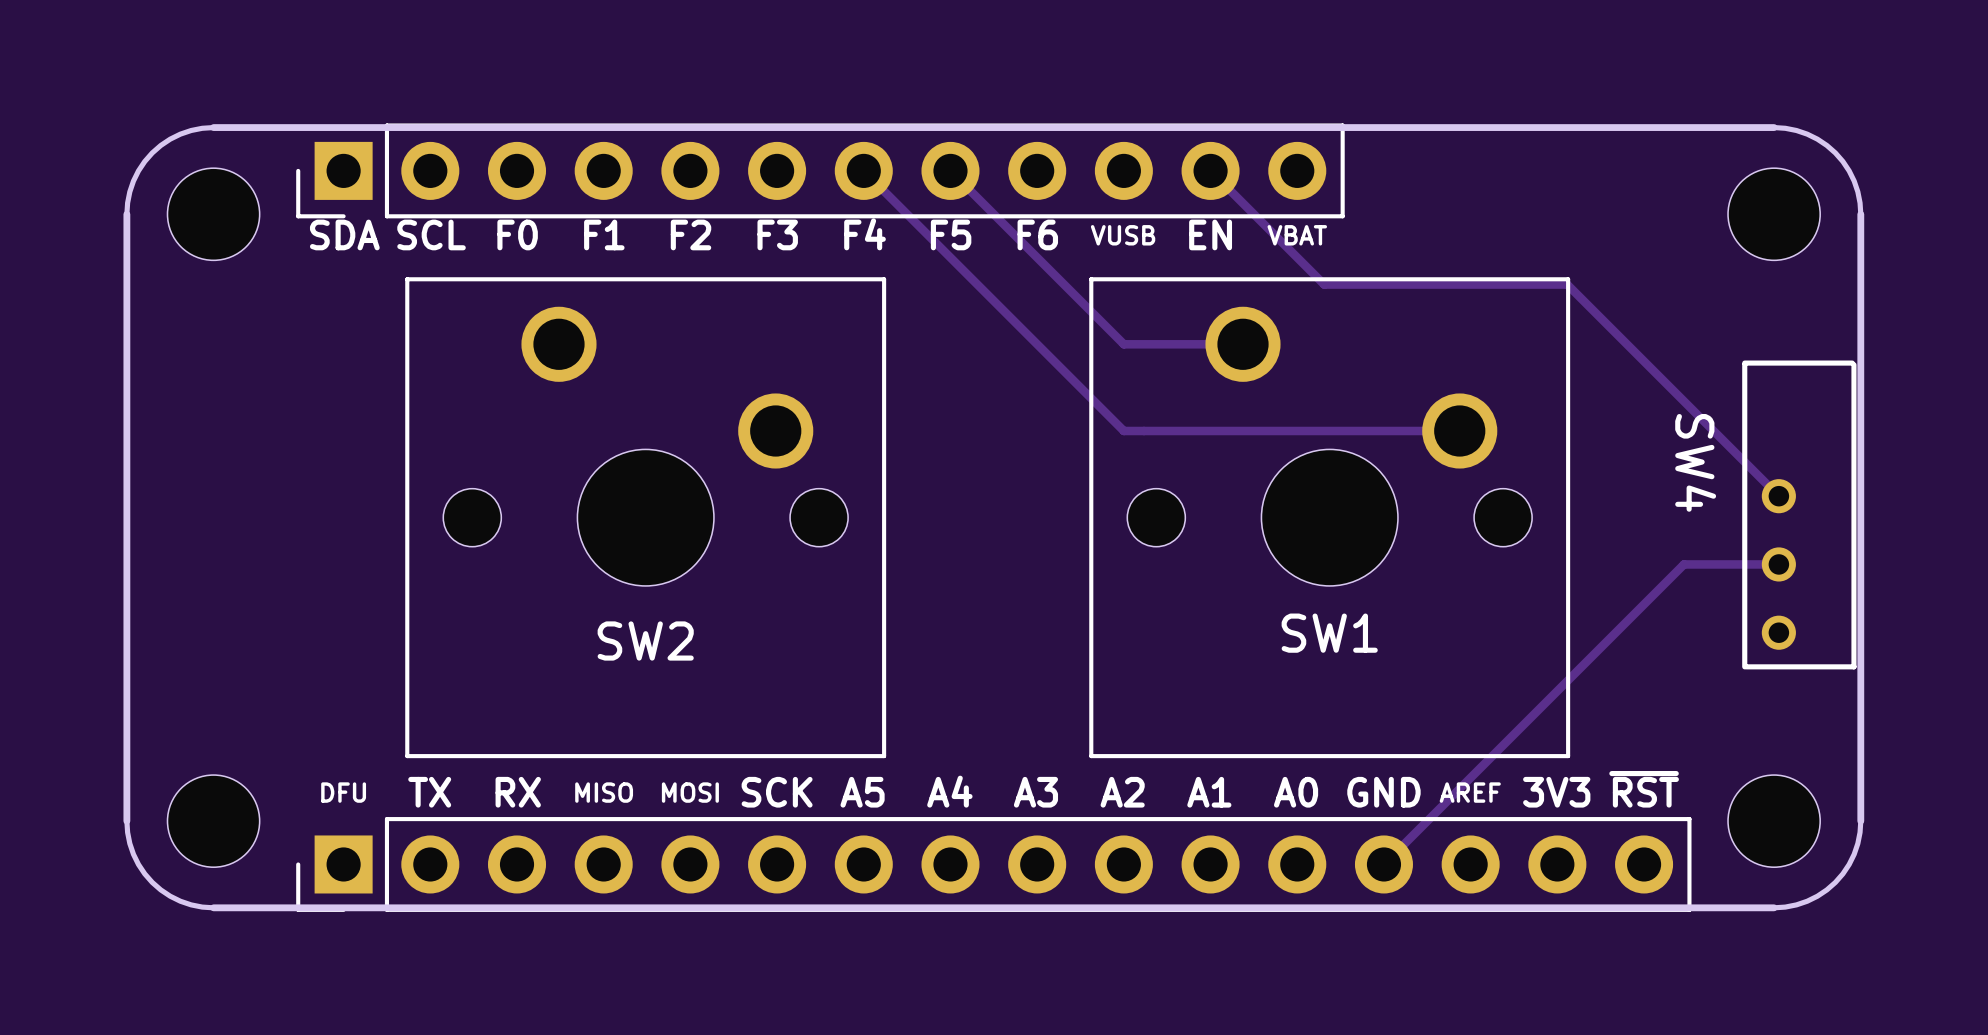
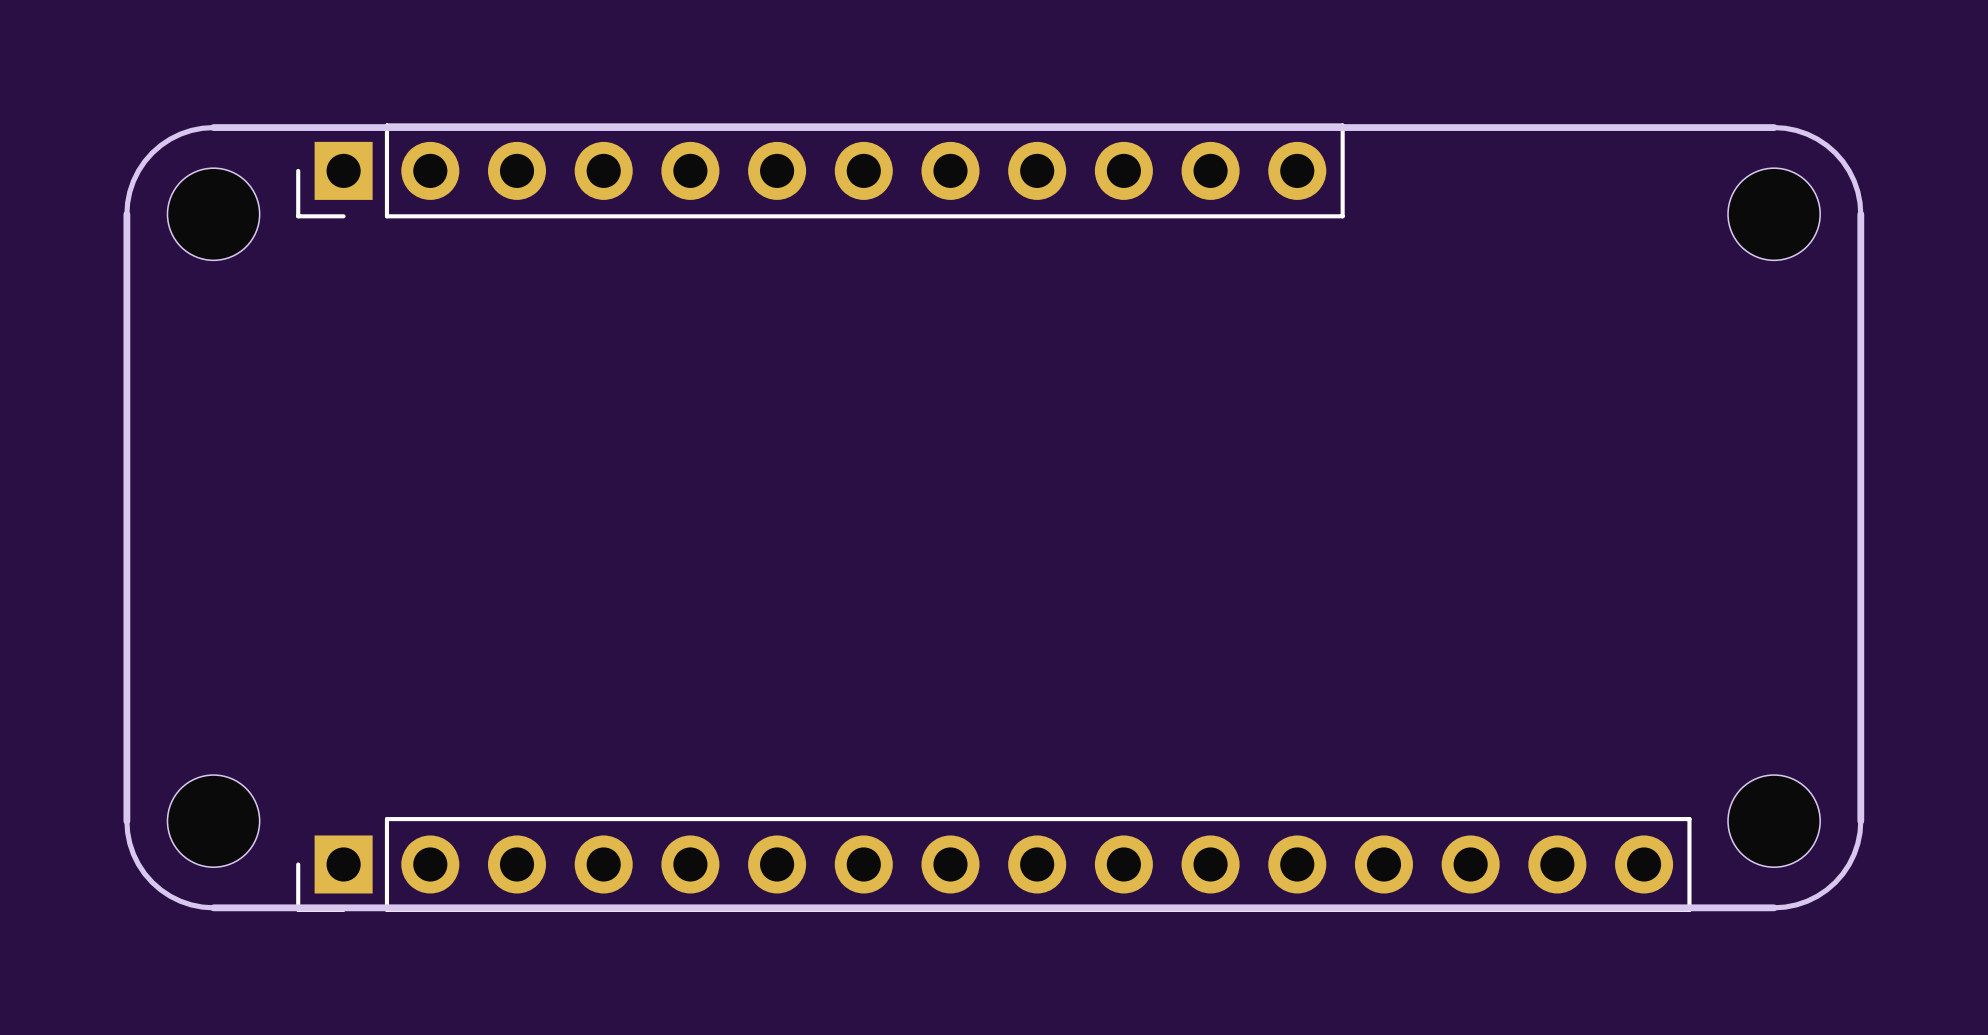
track: (863, 170) (1123, 430) (1459, 430) -> none
track: (950, 170) (1123, 344) (1243, 344) -> none
track: (1210, 170) (1324, 284) (1567, 284) (1778, 496) -> none
text: SDA (344, 234) -> none
text: SCL (431, 234) -> none
text: F0 (517, 234) -> none
text: F1 (604, 234) -> none
text: F2 (691, 234) -> none
text: F3 (777, 234) -> none
text: F4 (865, 234) -> none
text: F5 (951, 234) -> none
text: F6 (1037, 234) -> none
text: EN (1210, 234) -> none
text: VUSB (1123, 235) -> none
text: VBAT (1297, 235) -> none
SW4: (1799, 514) -> none
SW2: (645, 517) -> none
SW1: (1329, 517) -> none
track: (1778, 564) (1683, 564) (1383, 864) -> none
text: ~{RST} (1644, 789) -> none
text: A4 (949, 791) -> none
text: DFU (343, 792) -> none
text: TX (429, 792) -> none
text: RX (518, 792) -> none
text: MISO (604, 792) -> none
text: MOSI (690, 792) -> none
text: SCK (777, 792) -> none
text: A5 (862, 792) -> none
text: A3 (1035, 792) -> none
text: A2 (1122, 792) -> none
text: A1 (1209, 792) -> none
text: A0 (1296, 792) -> none
text: GND (1383, 792) -> none
text: AREF (1470, 792) -> none
text: 3V3 (1556, 792) -> none

